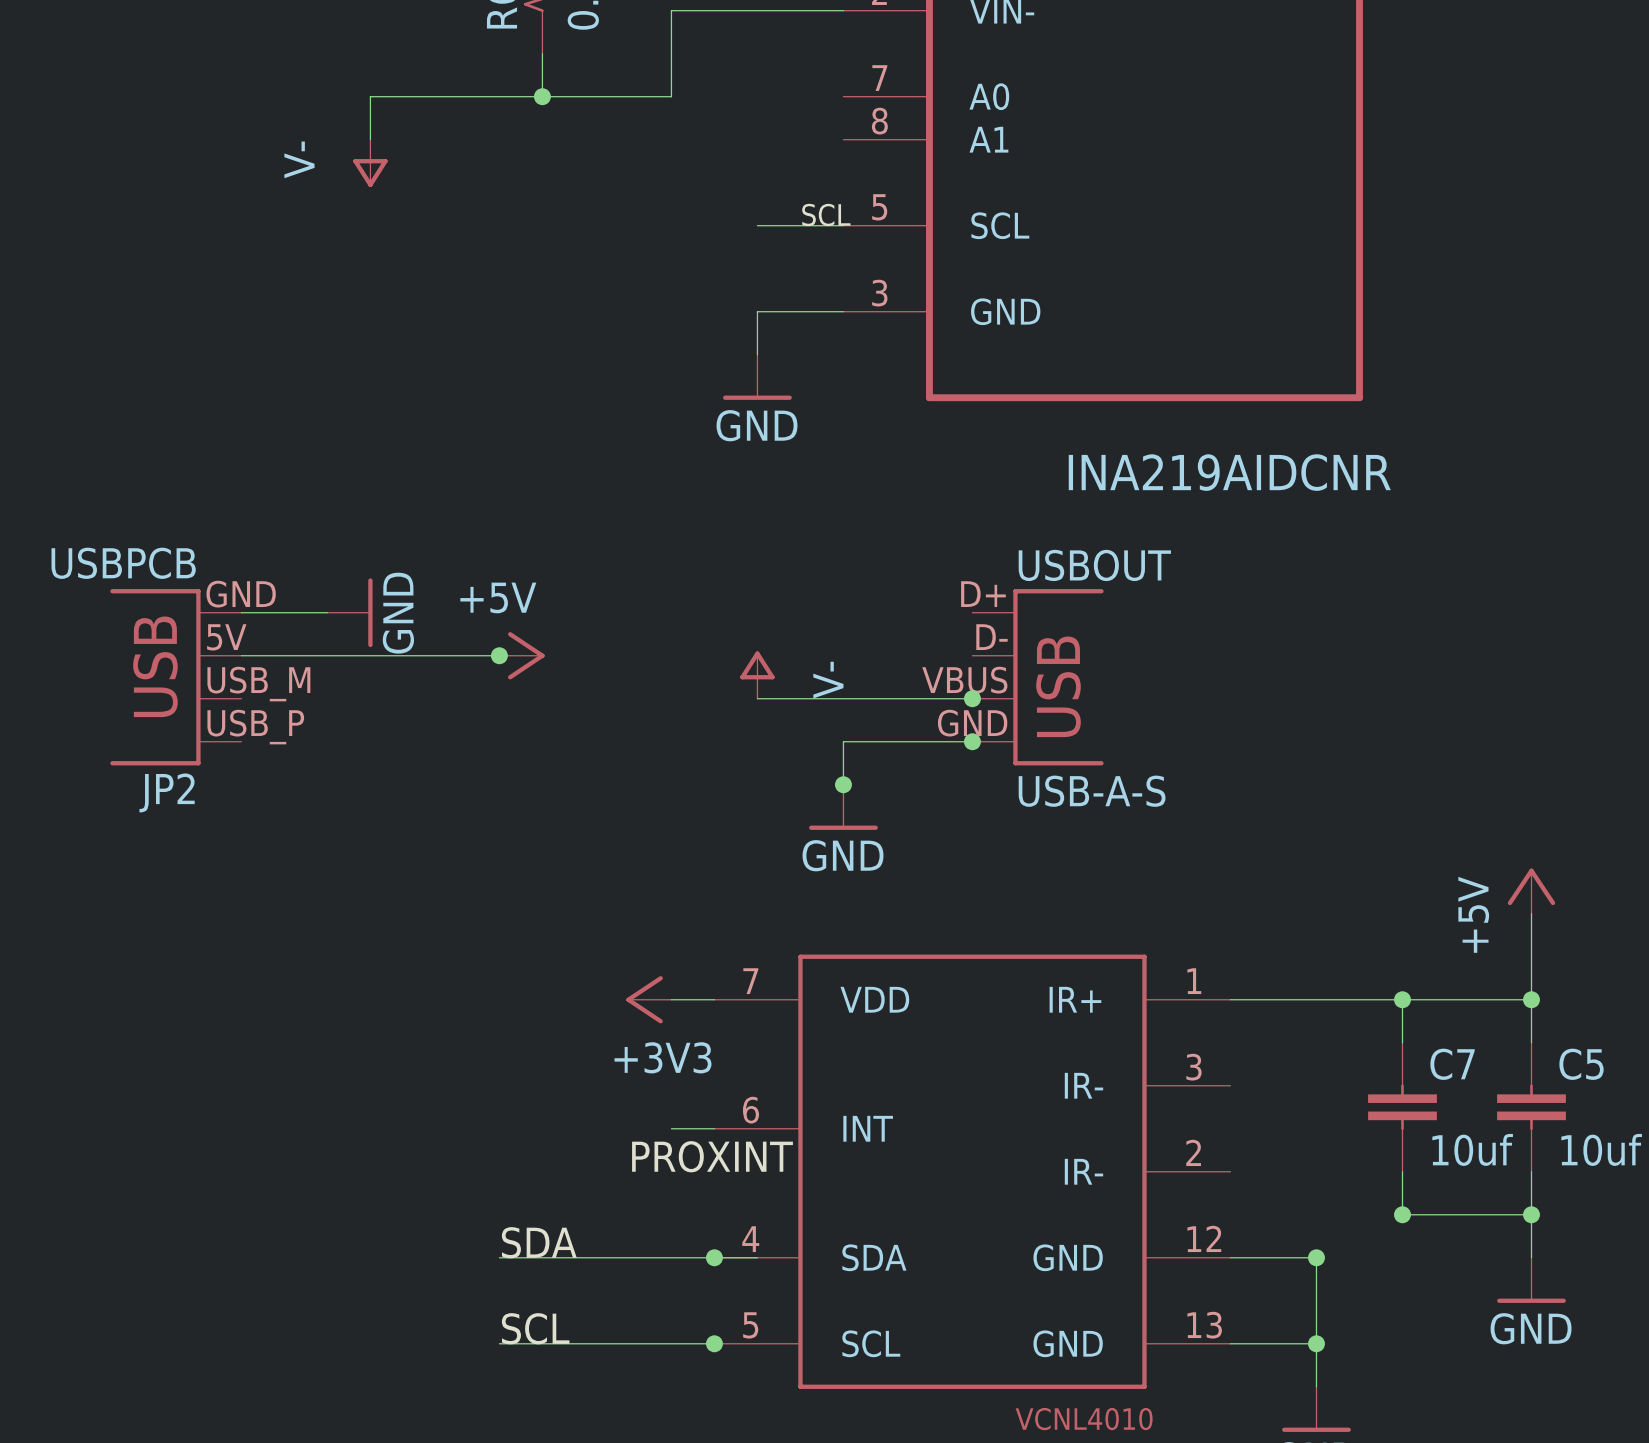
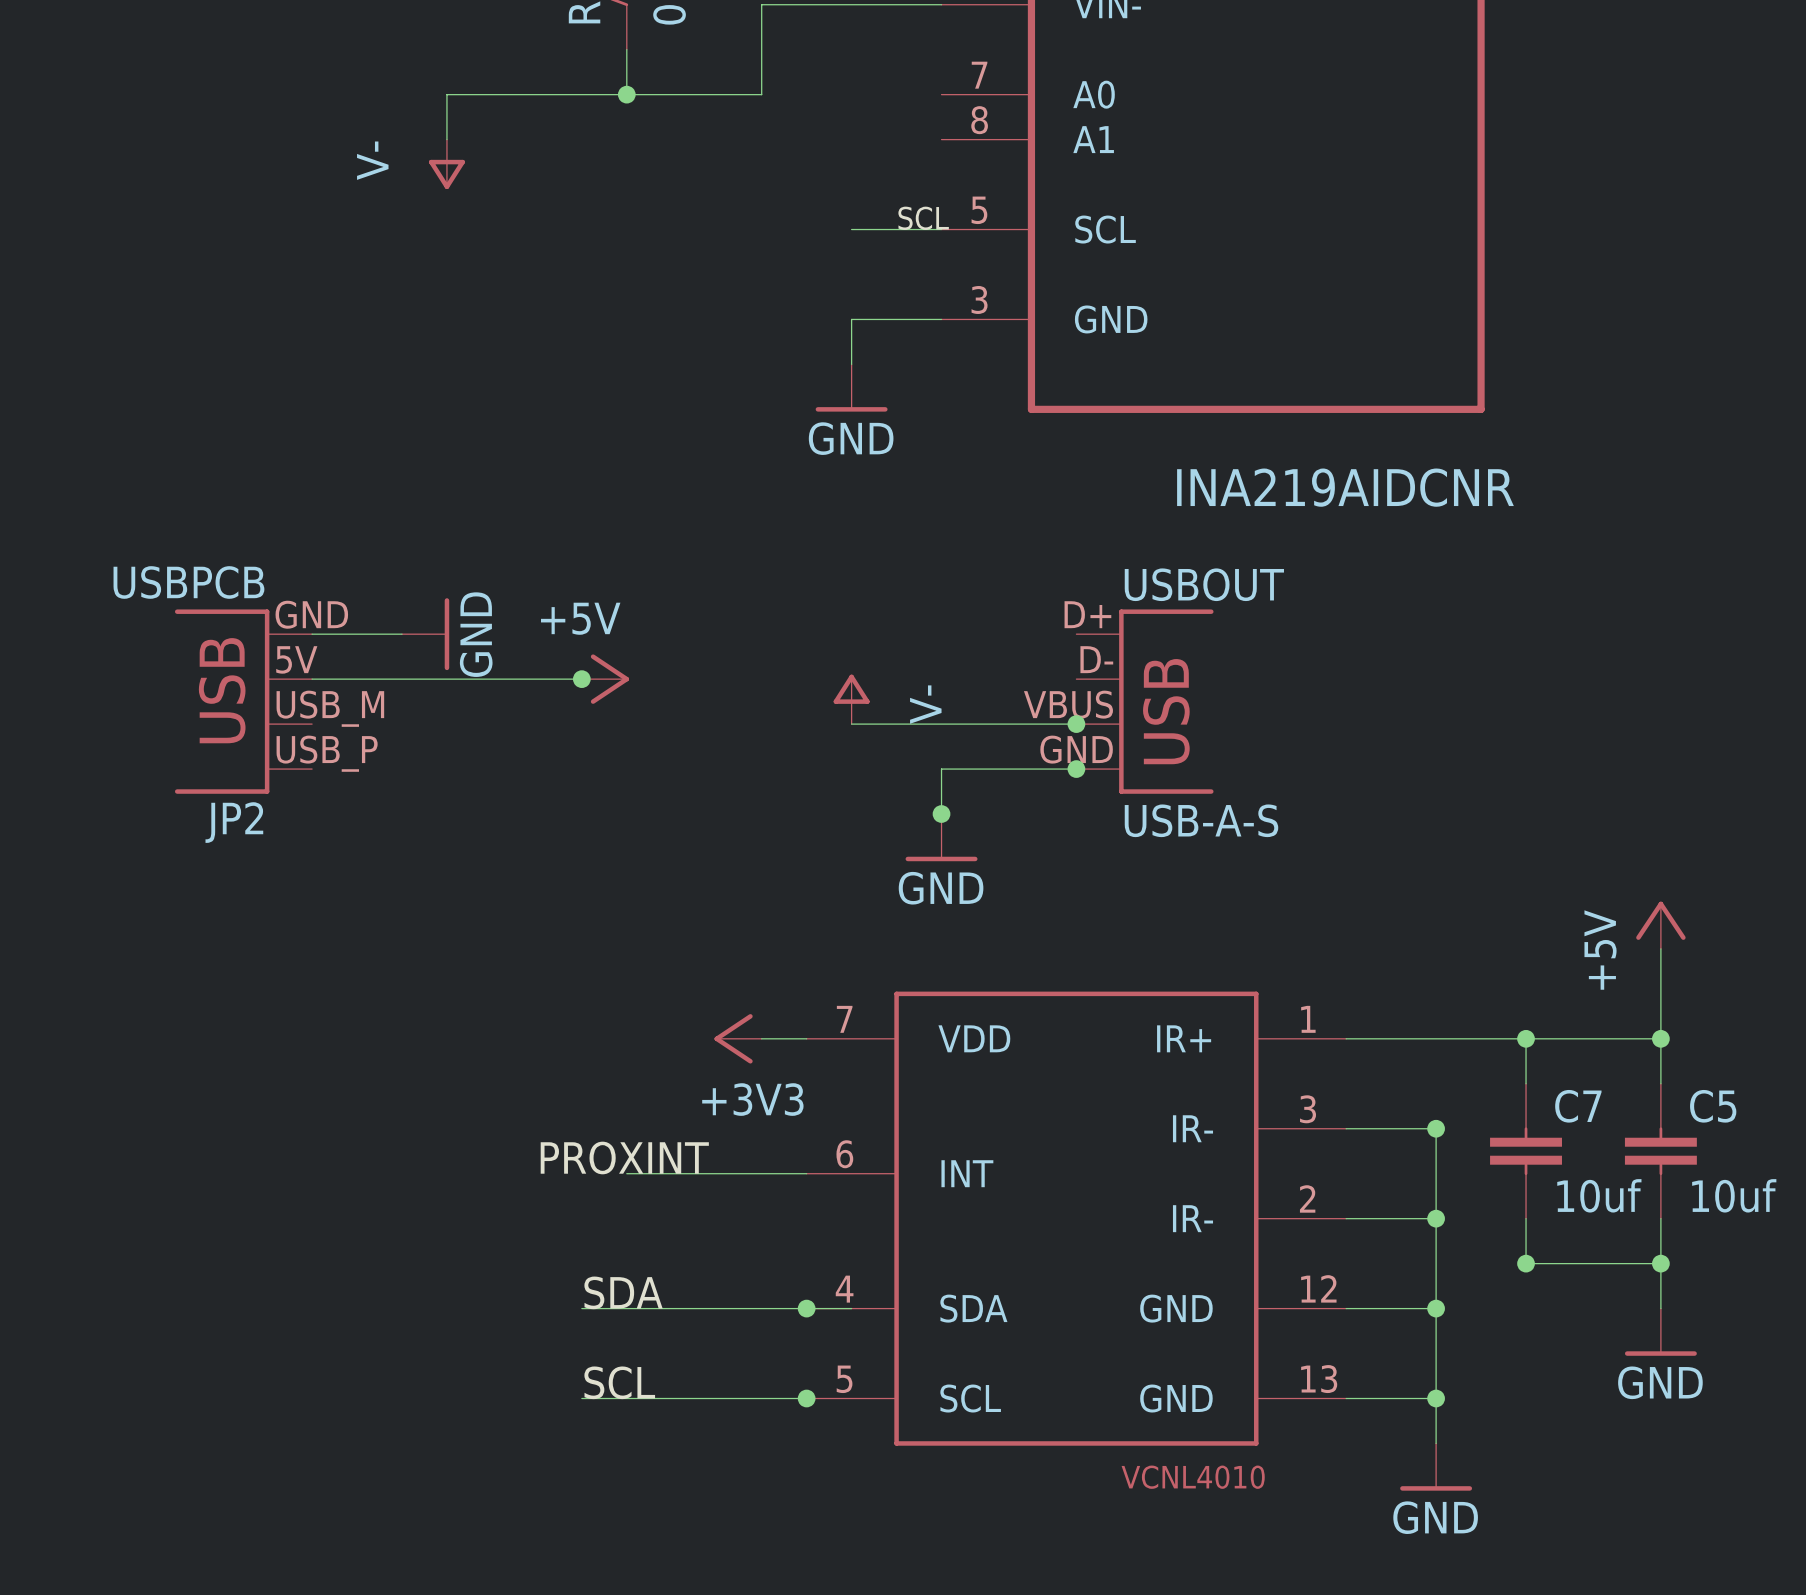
wire: none -> (1346, 1128) (1436, 1128) (1436, 1308)
junction: none -> (1436, 1128)
wire: none -> (626, 1173) (761, 1173)
label position: PROXINT (712, 1156) -> PROXINT (624, 1157)
wire: none -> (1346, 1218) (1436, 1218)
junction: none -> (1436, 1218)

